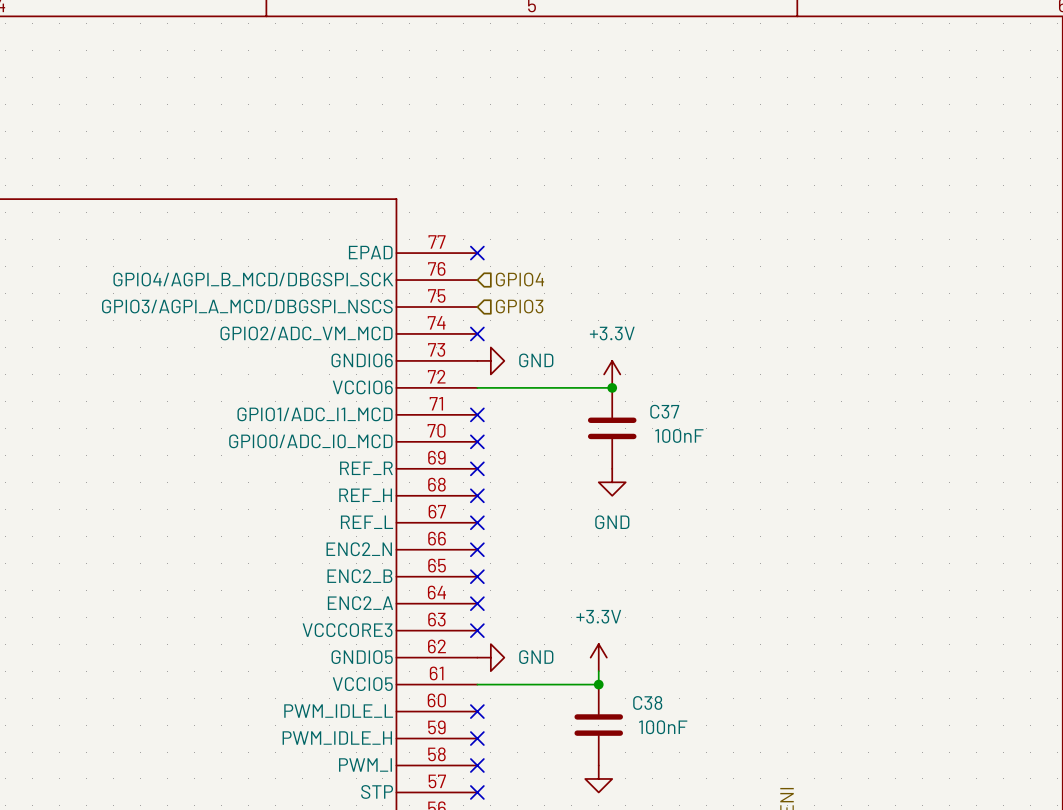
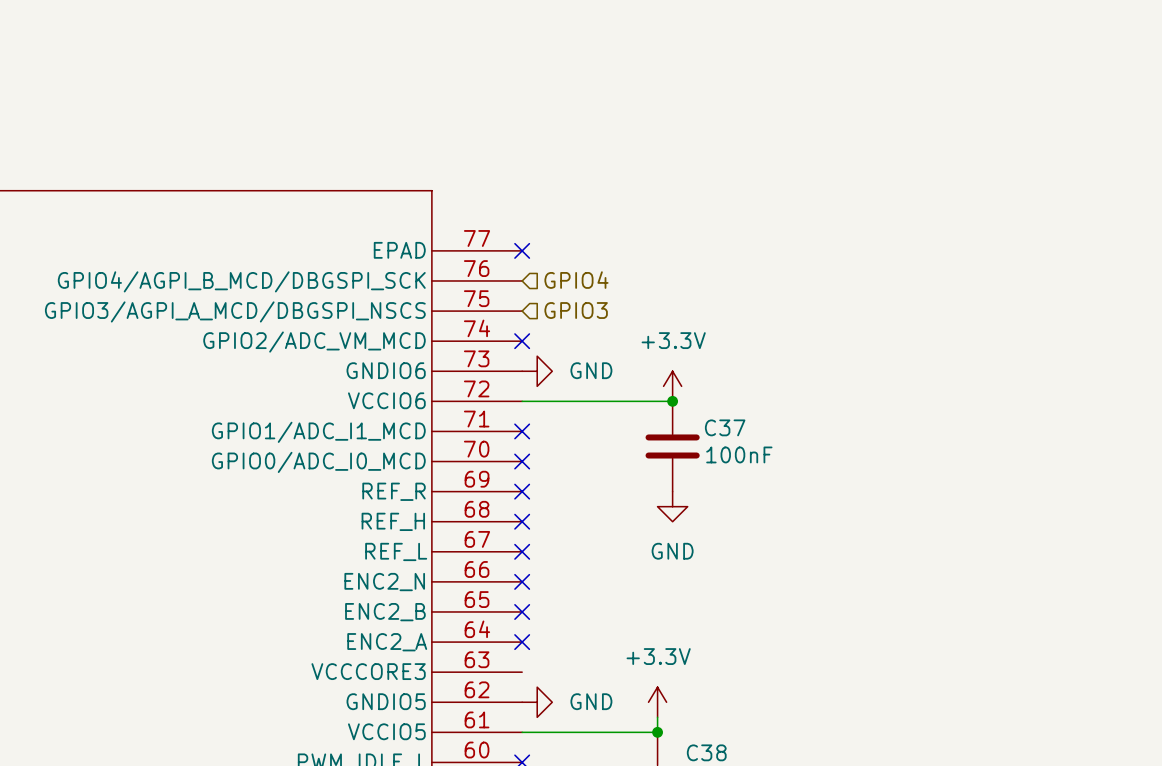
no-connect mark: (477, 630) -> none

